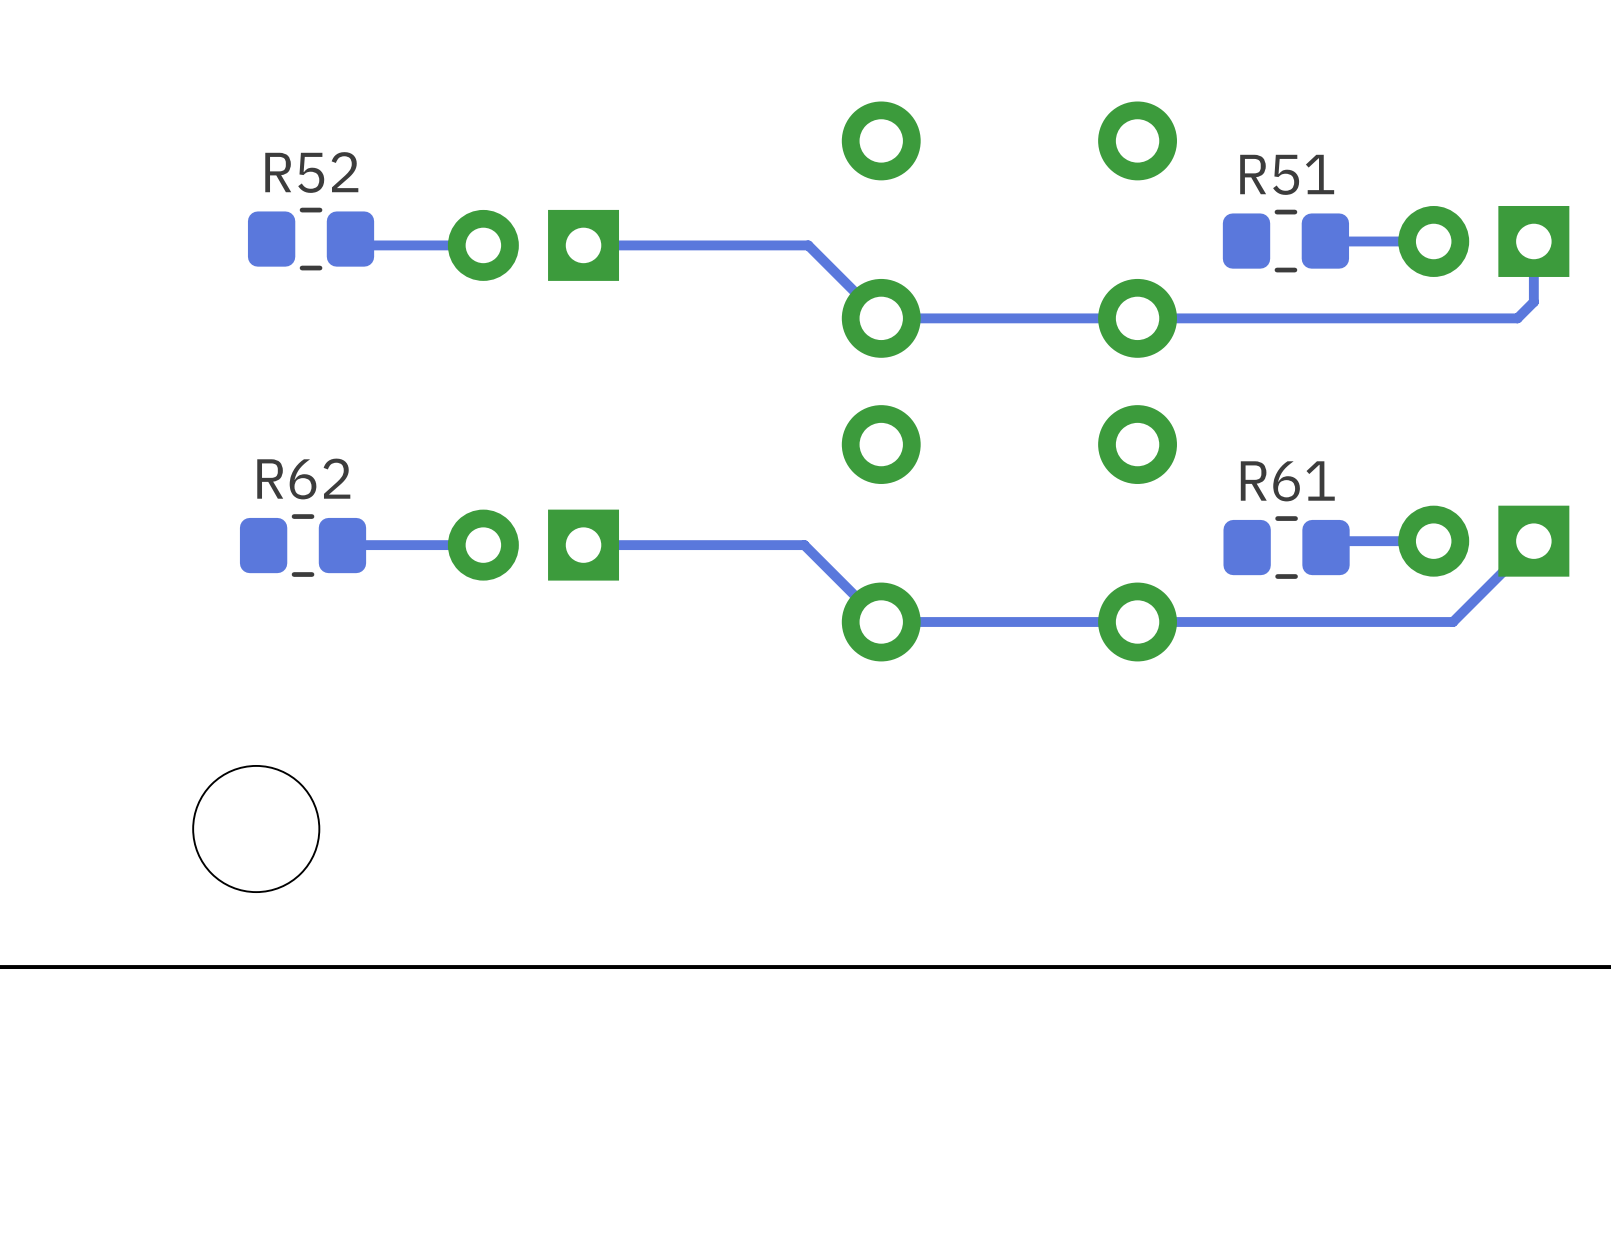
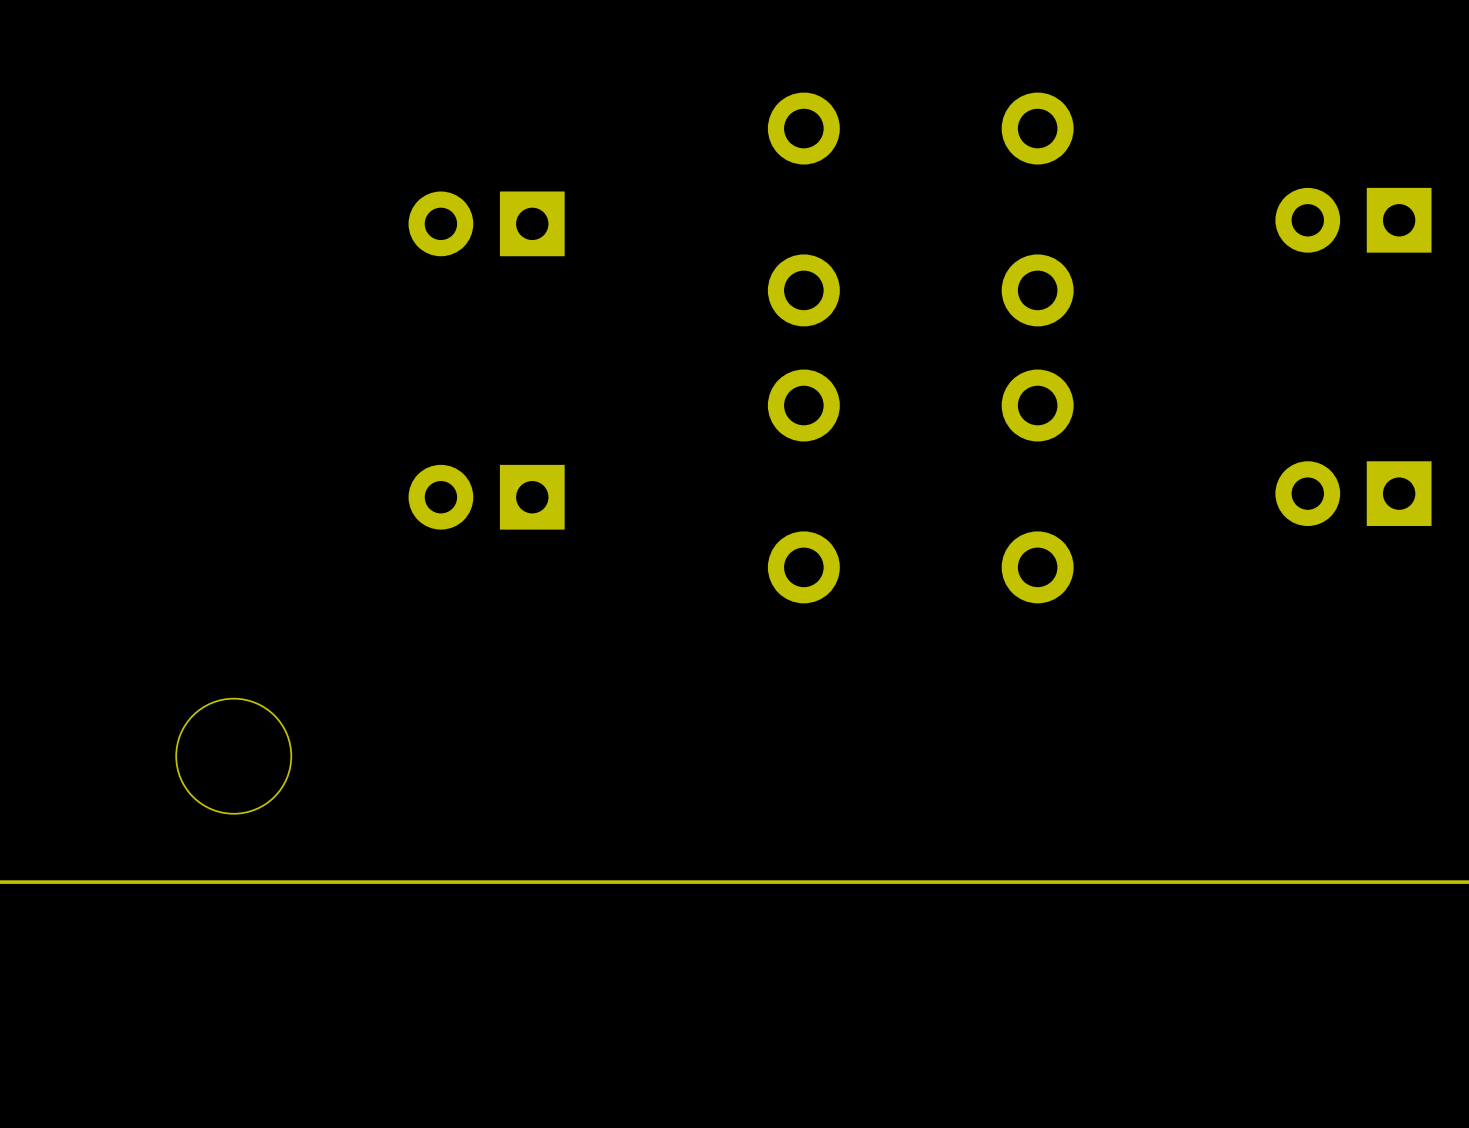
R52: (311, 239) -> none
track: (350, 239) (356, 245) (483, 245) -> none
R51: (1285, 241) -> none
track: (1433, 241) (1325, 241) -> none
track: (1533, 241) (1533, 302) (1517, 318) (881, 318) (808, 245) (583, 245) -> none
track: (1433, 541) (1332, 541) (1326, 547) -> none
track: (1533, 541) (1453, 622) (881, 622) (804, 545) (583, 545) -> none
R62: (303, 545) -> none
track: (483, 545) (342, 545) -> none
R61: (1286, 547) -> none

